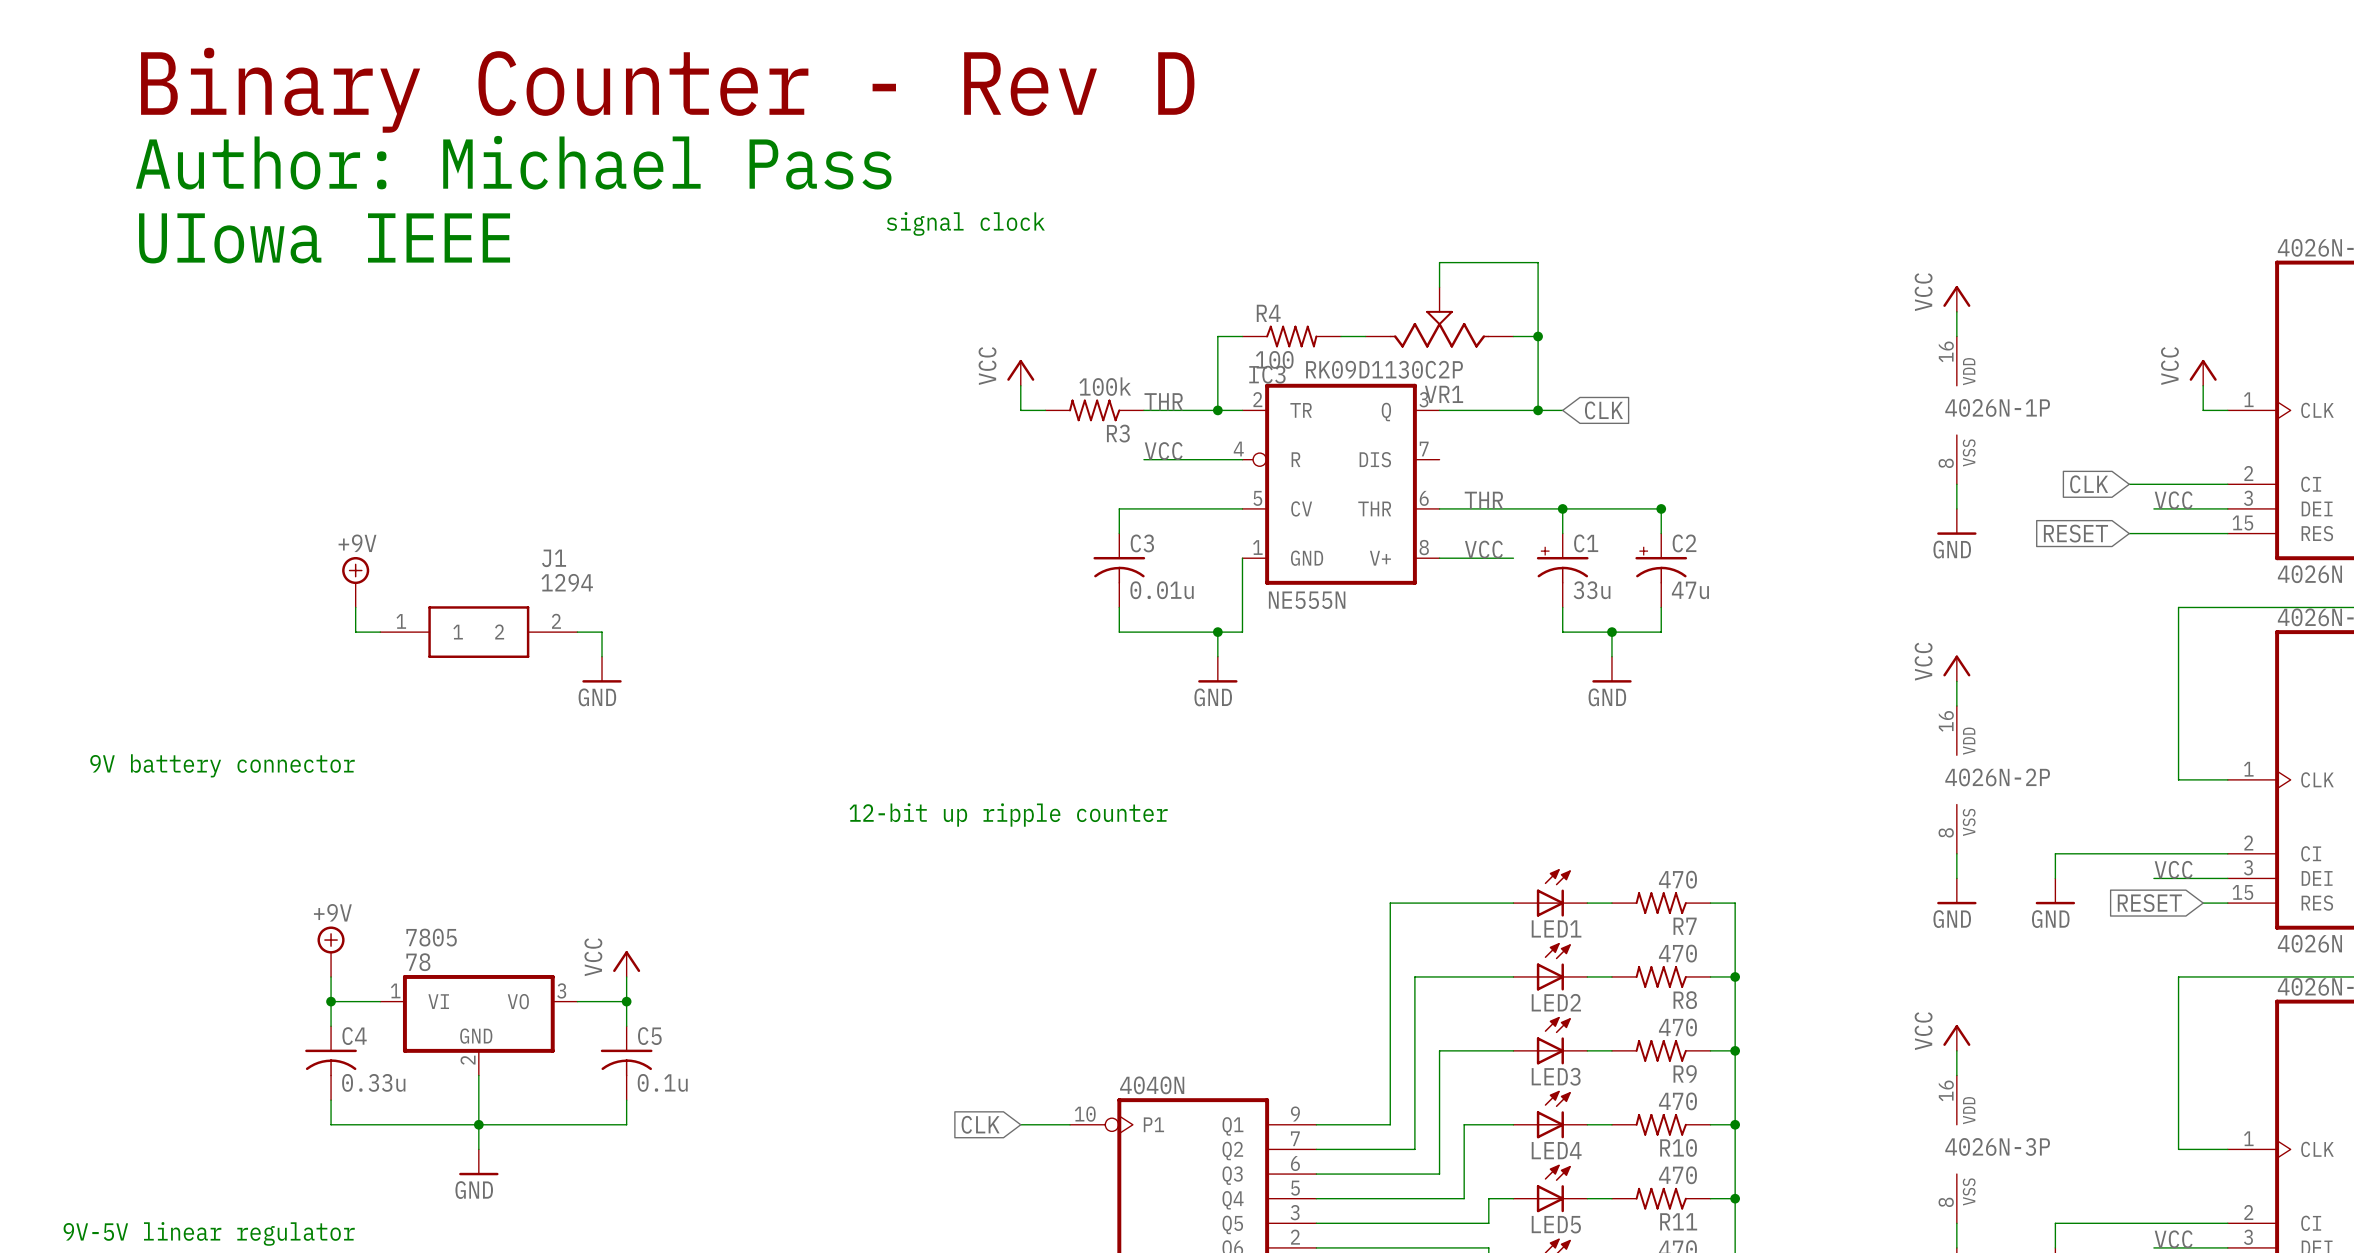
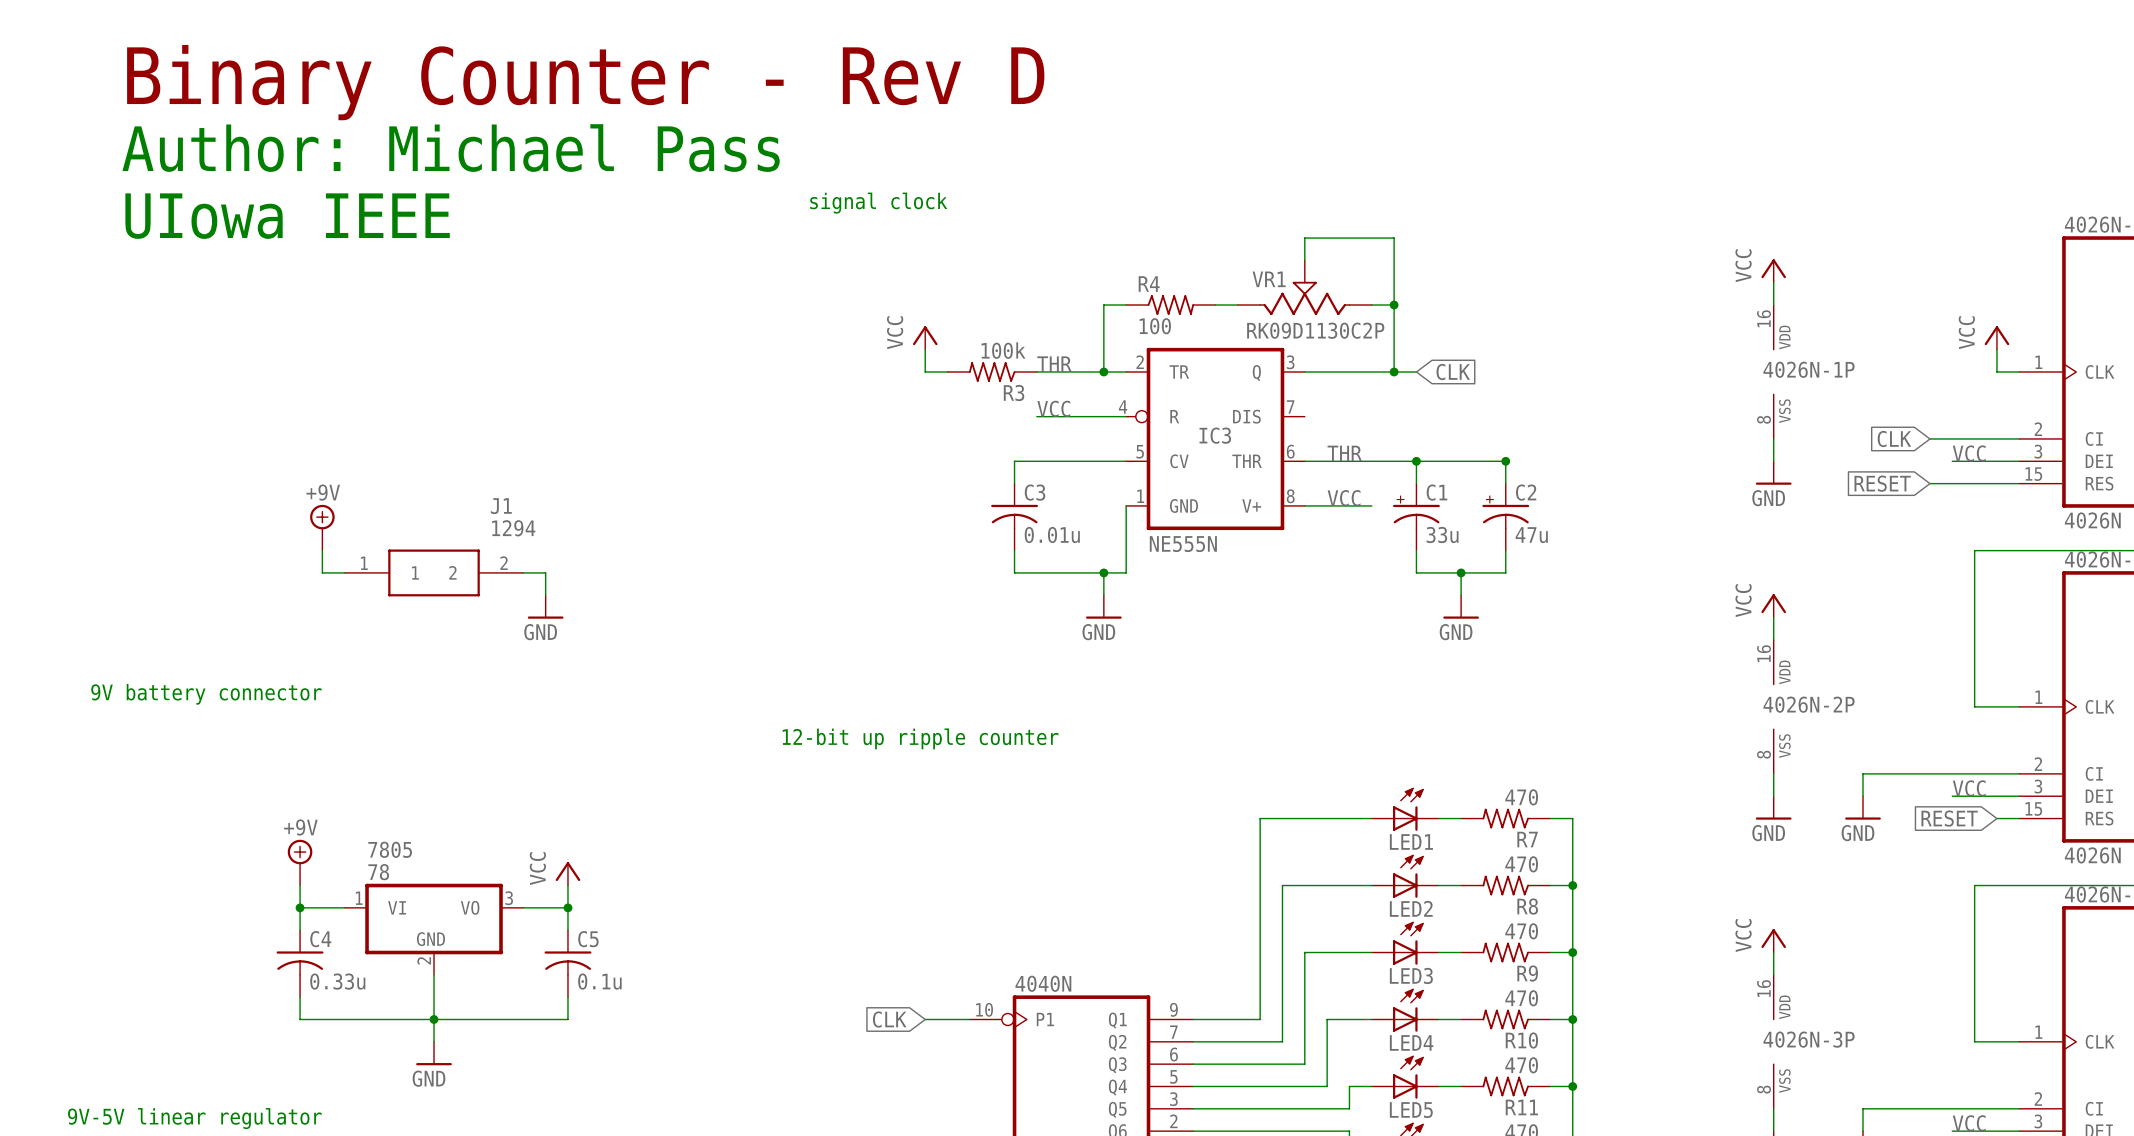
VR1 value position: RK09D1130C2P (1384, 369) -> RK09D1130C2P (1315, 330)
IC3 name position: IC3 (1267, 374) -> IC3 (1215, 435)
VR1 name position: VR1 (1444, 394) -> VR1 (1269, 279)

